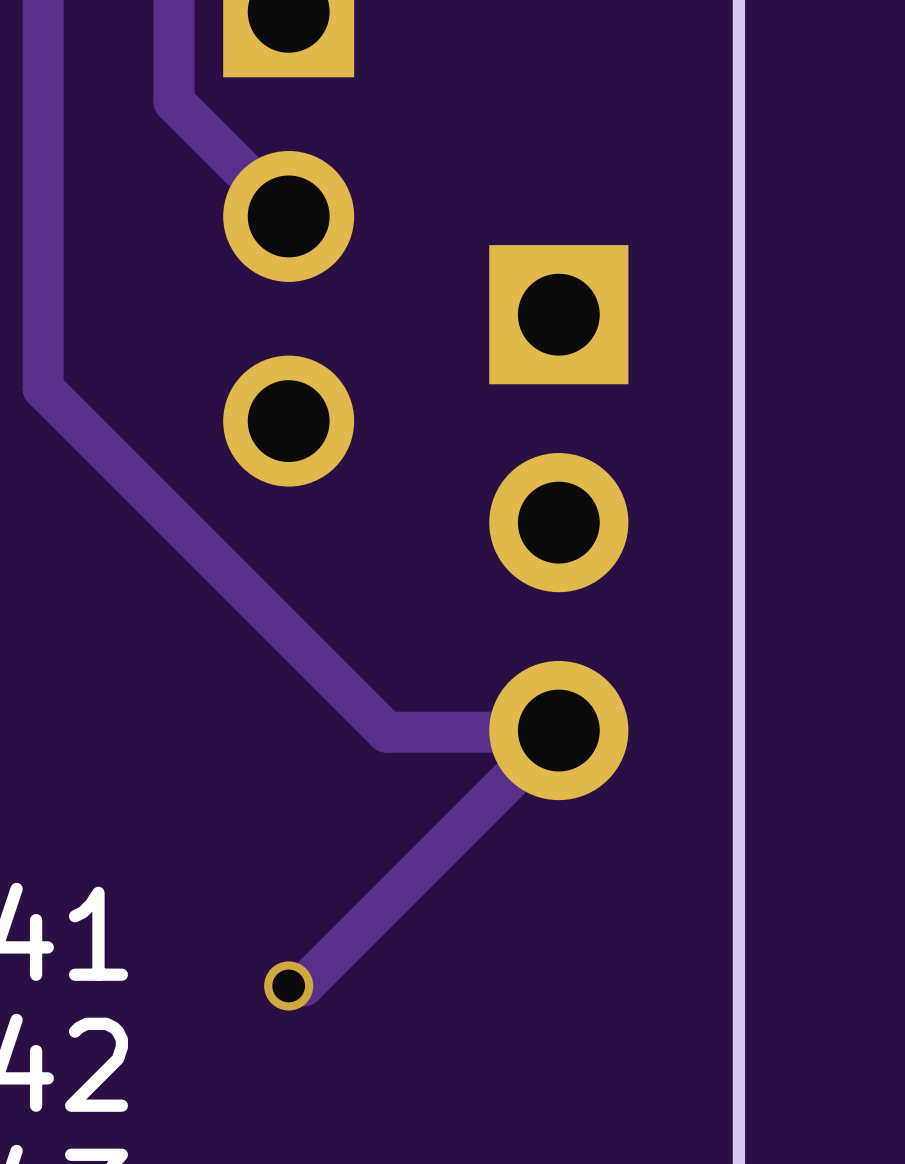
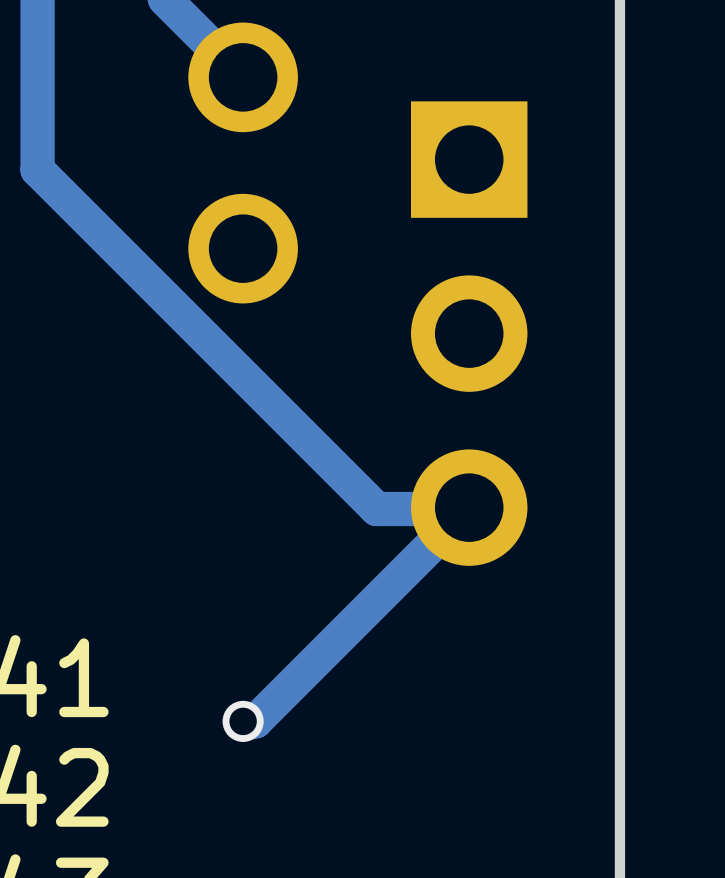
track: (43, 326) (43, 388) (386, 732) (448, 732) -> (37, 169) (376, 509)

